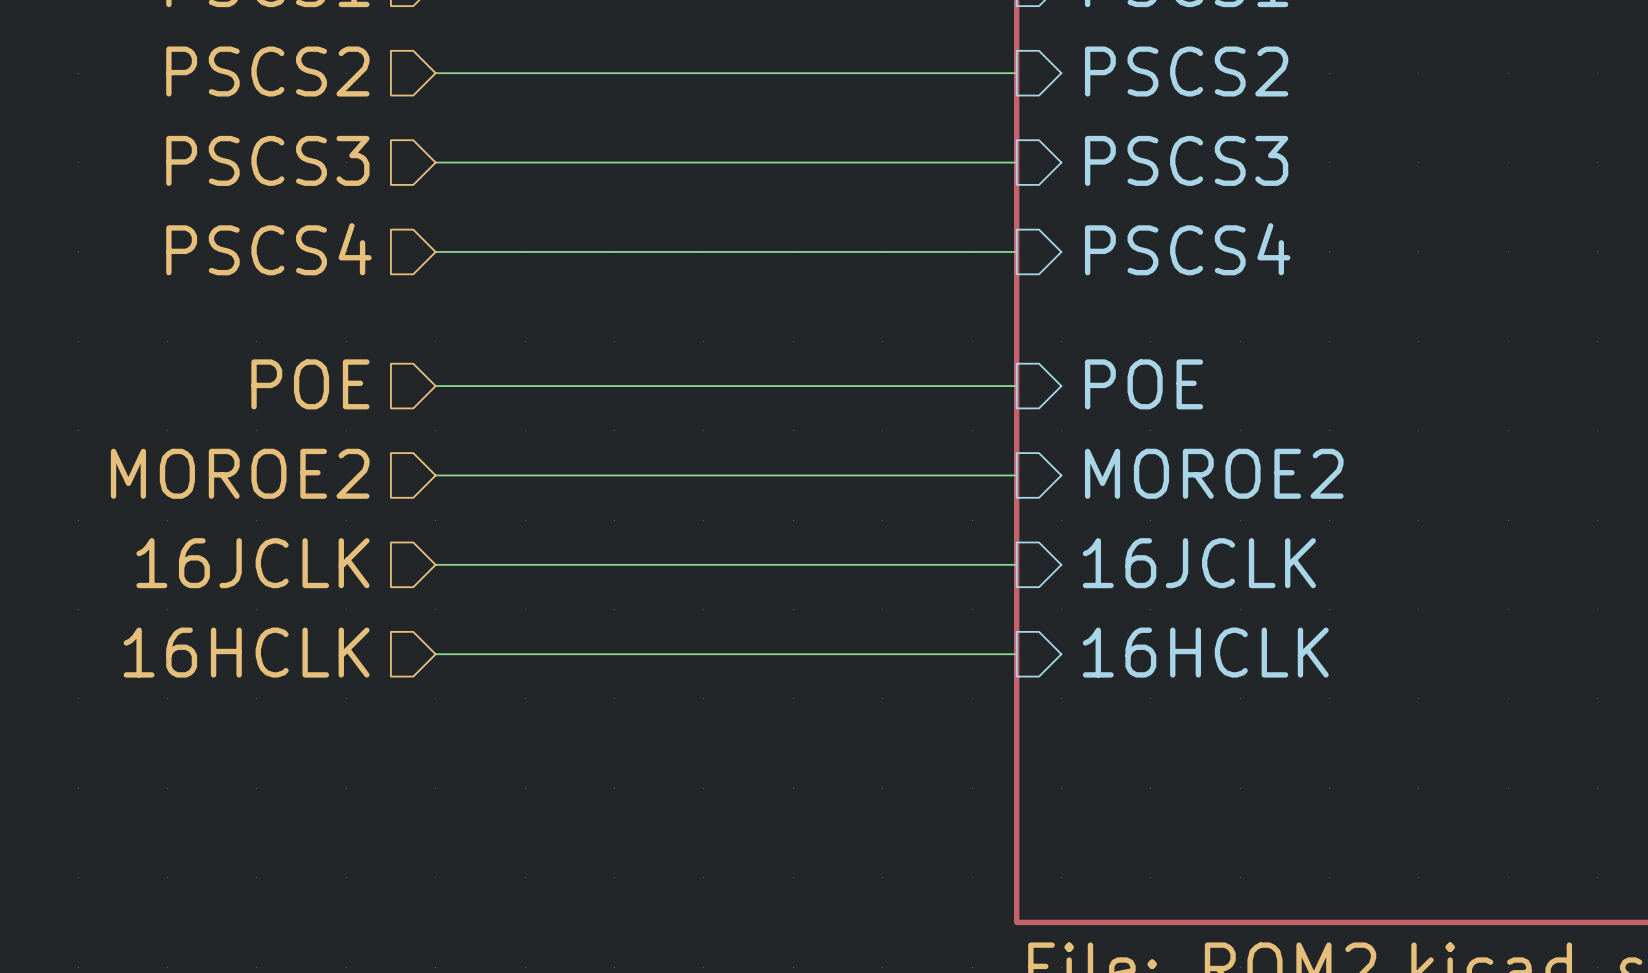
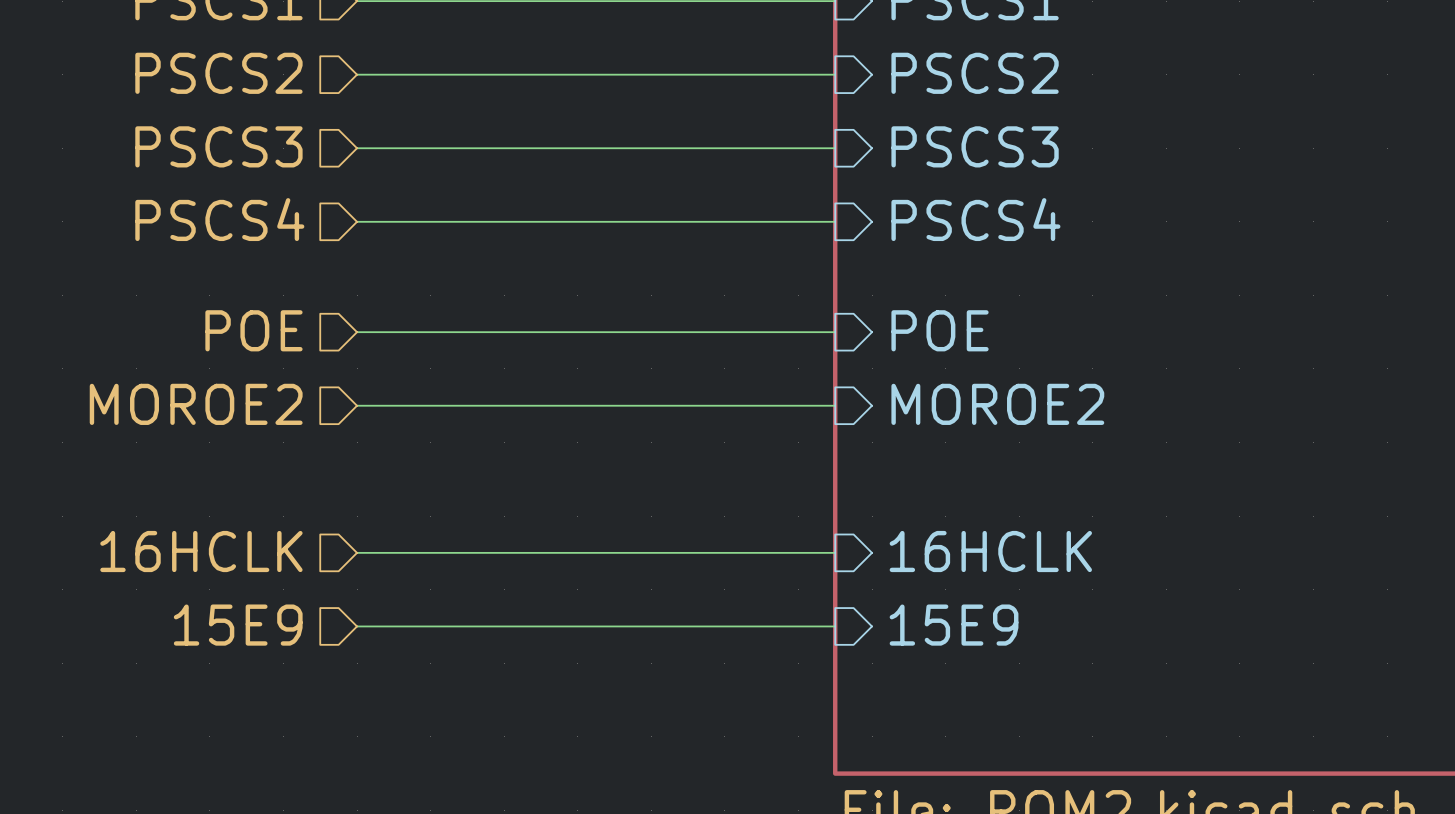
hierarchical label: 16JCLK (252, 563) -> none
sheet pin: 16JCLK (1199, 563) -> none
wire: (435, 564) (1016, 564) -> (357, 626) (835, 626)
hierarchical label: none -> 15E9 (238, 625)
sheet pin: none -> 15E9 (954, 625)

